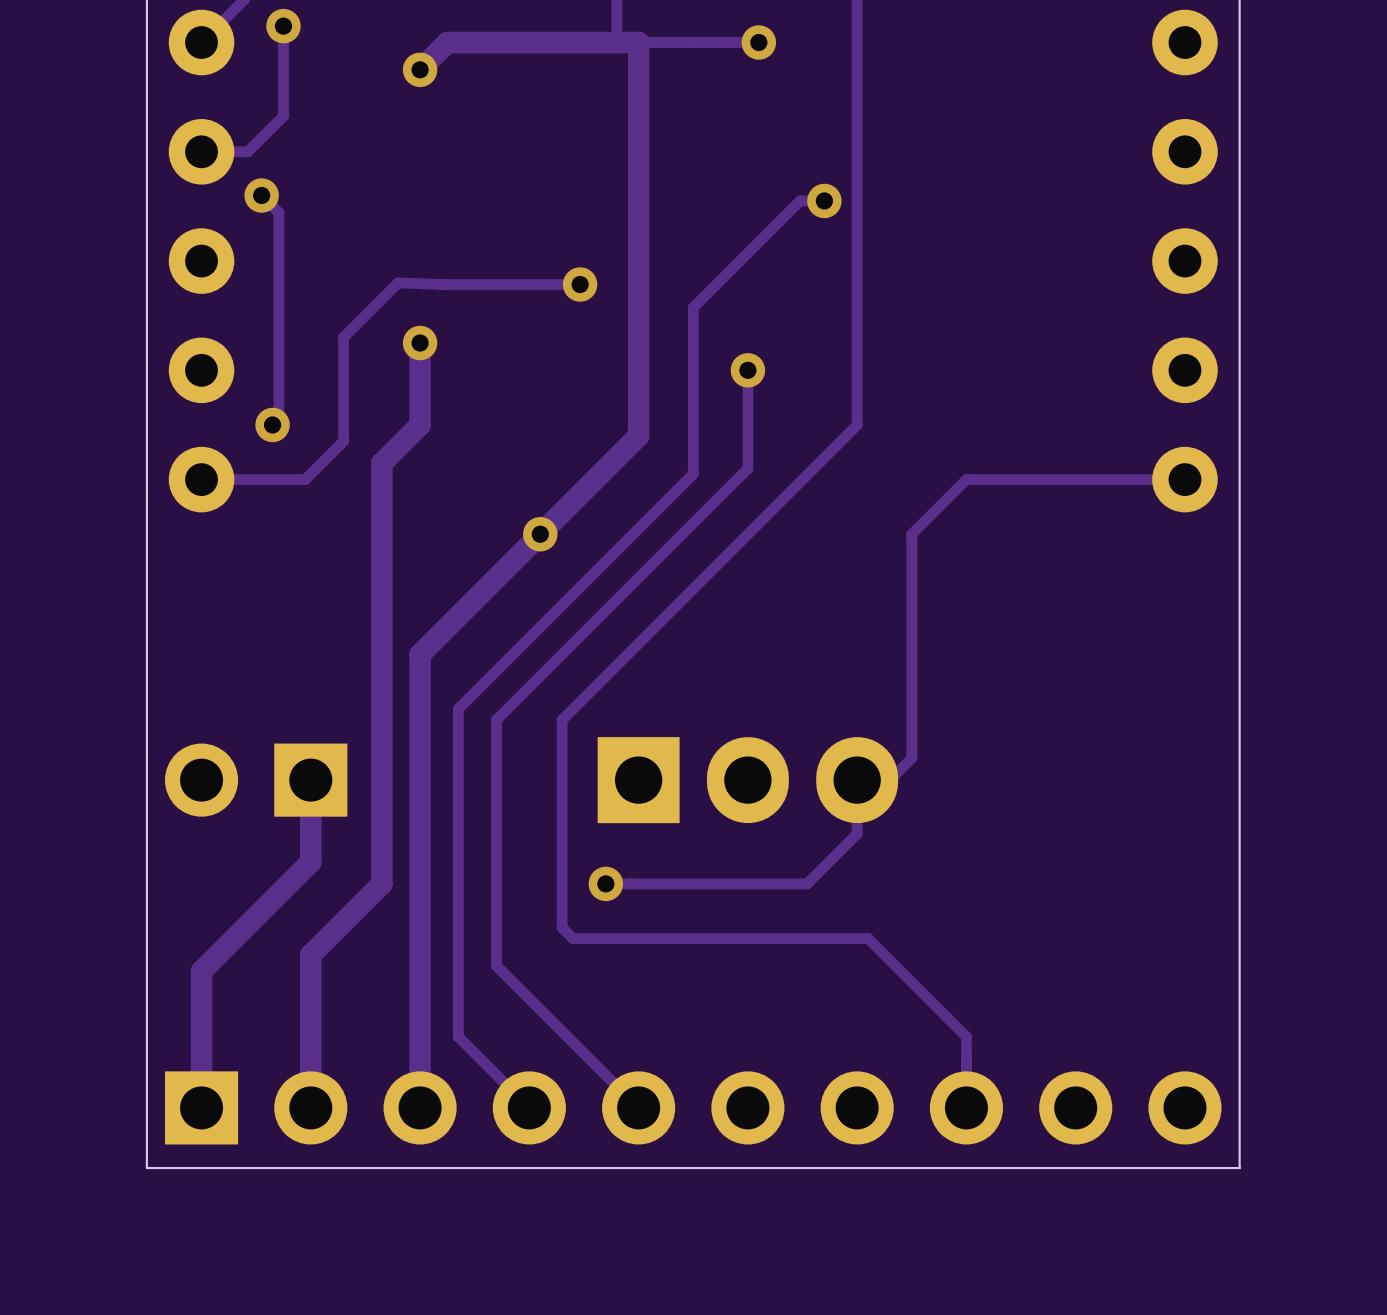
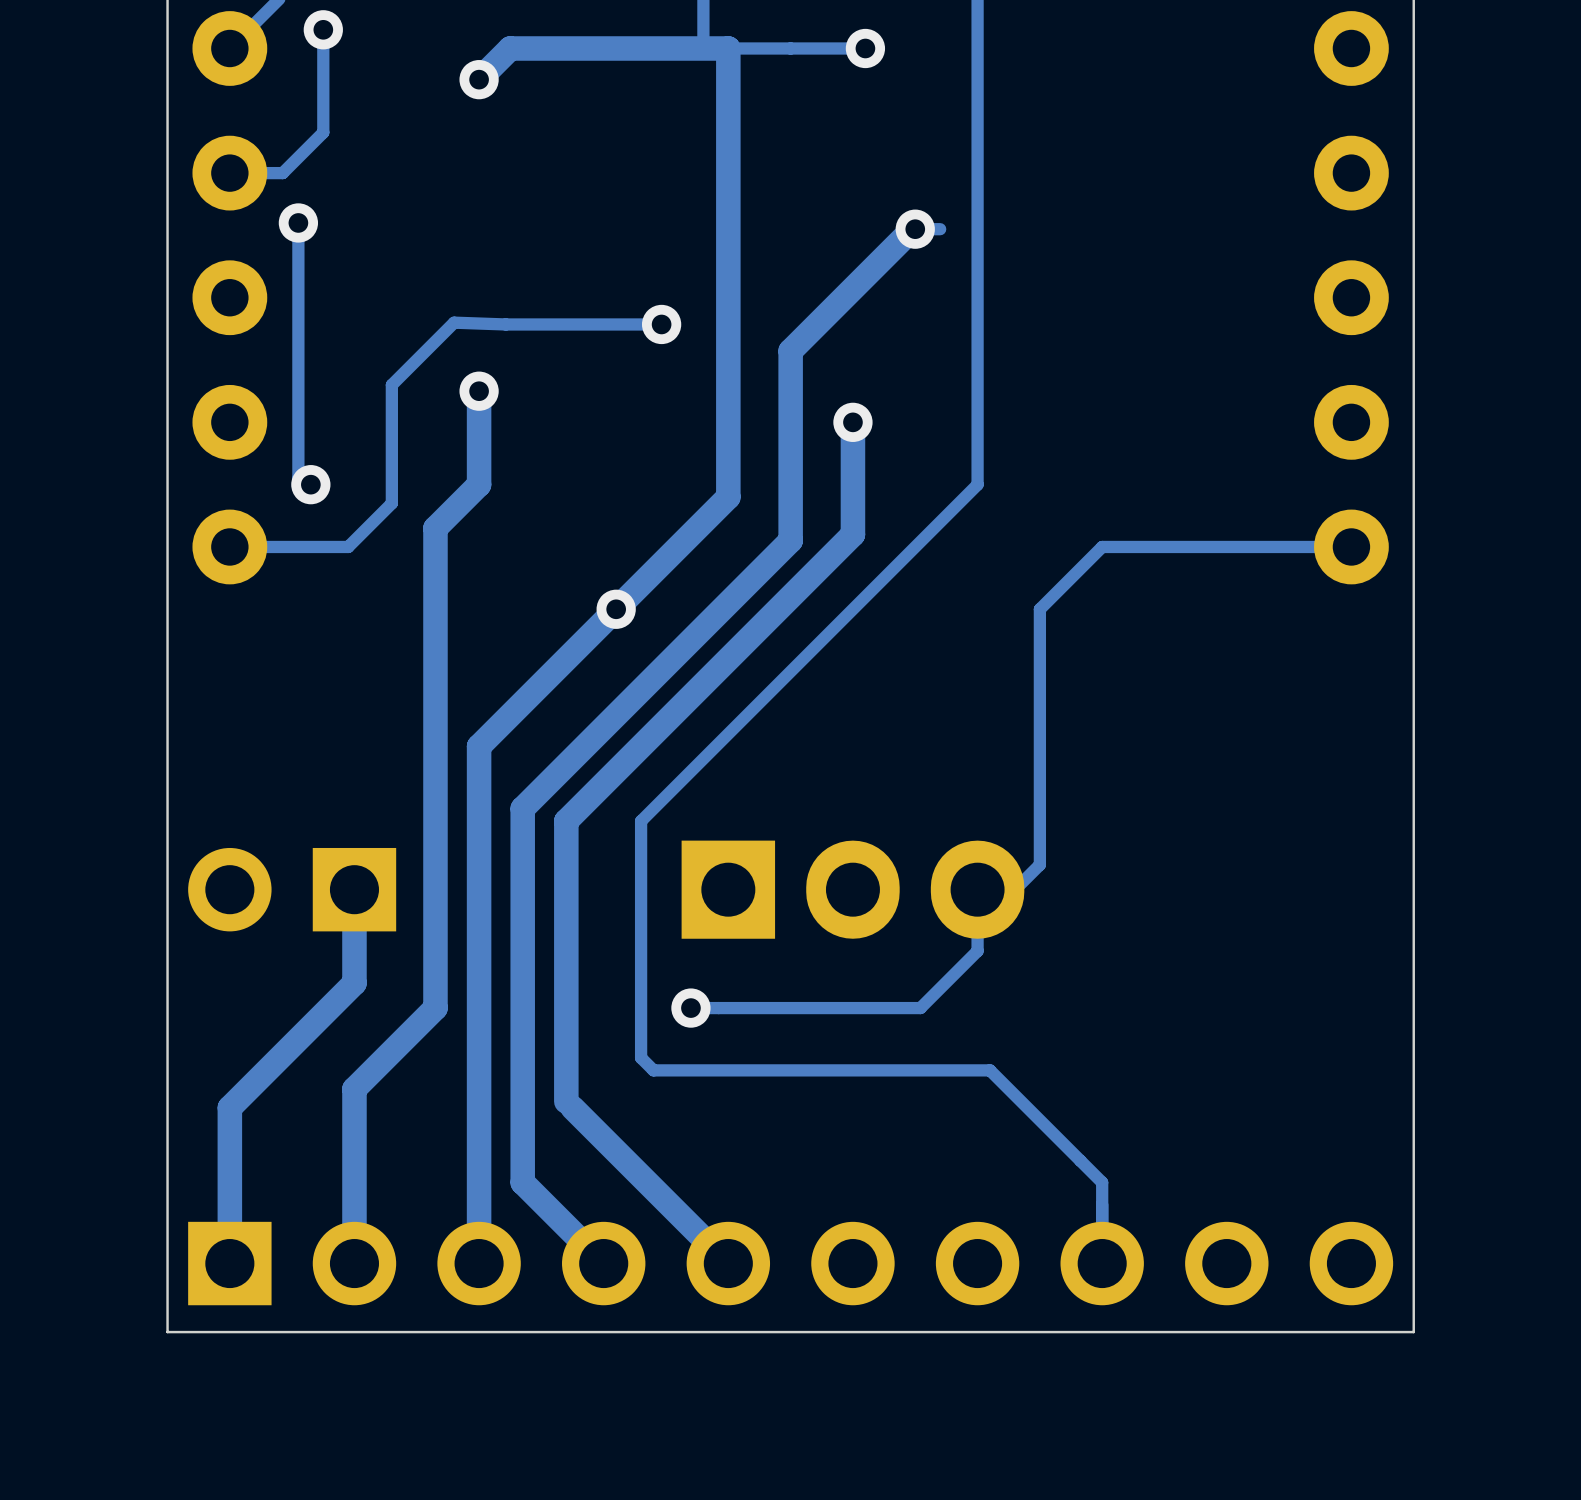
track: (261, 195) (278, 212) (278, 418) (272, 424) -> (298, 222) (298, 478) (304, 484)
track width: thin (800, 200) (693, 307) (693, 474) (458, 709) (458, 1036) (529, 1107) -> thick (912, 229) (790, 350) (790, 540) (522, 808) (522, 1182) (603, 1263)
via position: (824, 200) -> (915, 229)
track width: thin (747, 370) (747, 468) (496, 720) (496, 965) -> thick (852, 422) (852, 534) (566, 821) (566, 1101)
track width: thin (502, 971) (638, 1107) -> thick (572, 1107) (728, 1263)

